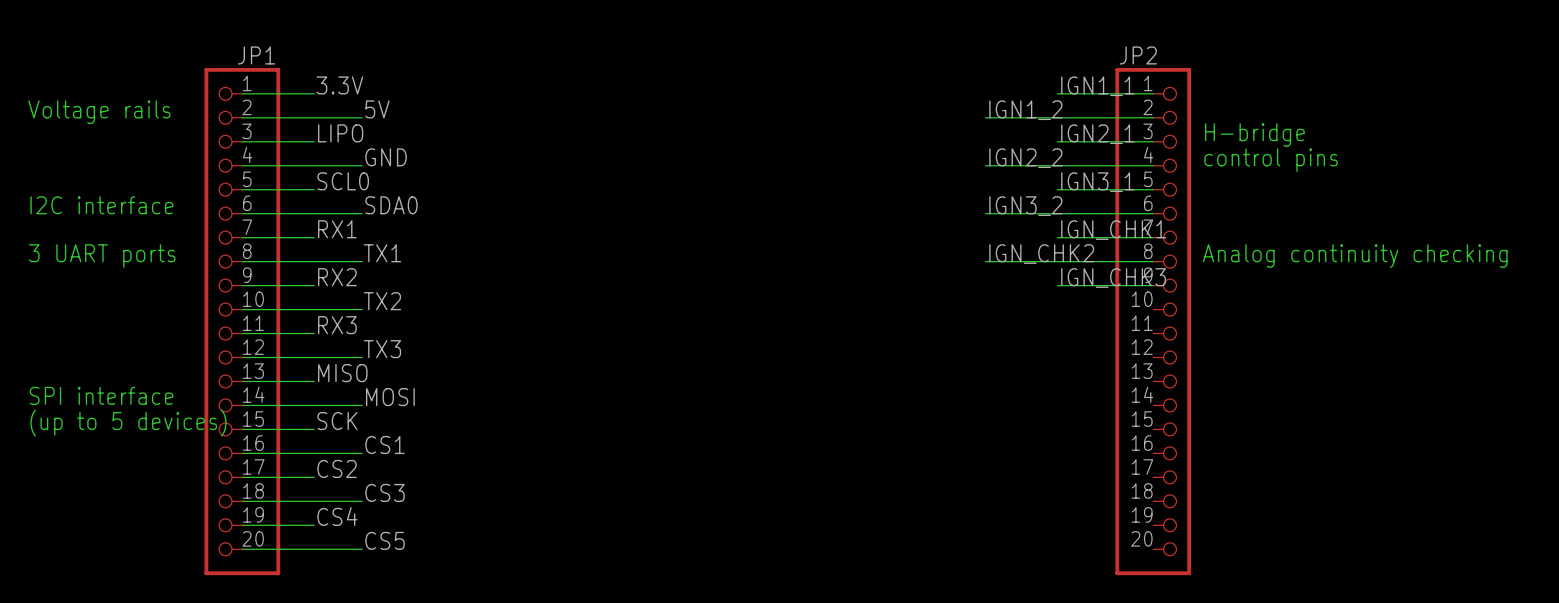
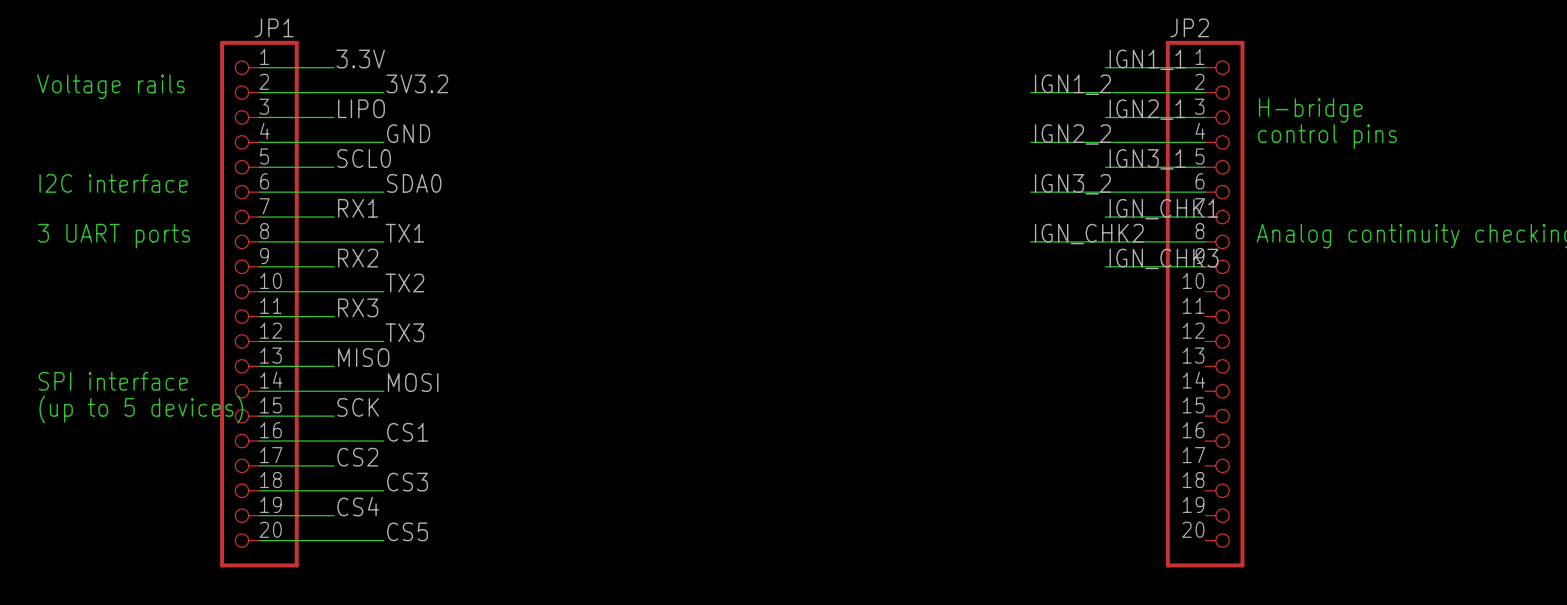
label: 5V (377, 109) -> 3V3.2 (417, 83)

